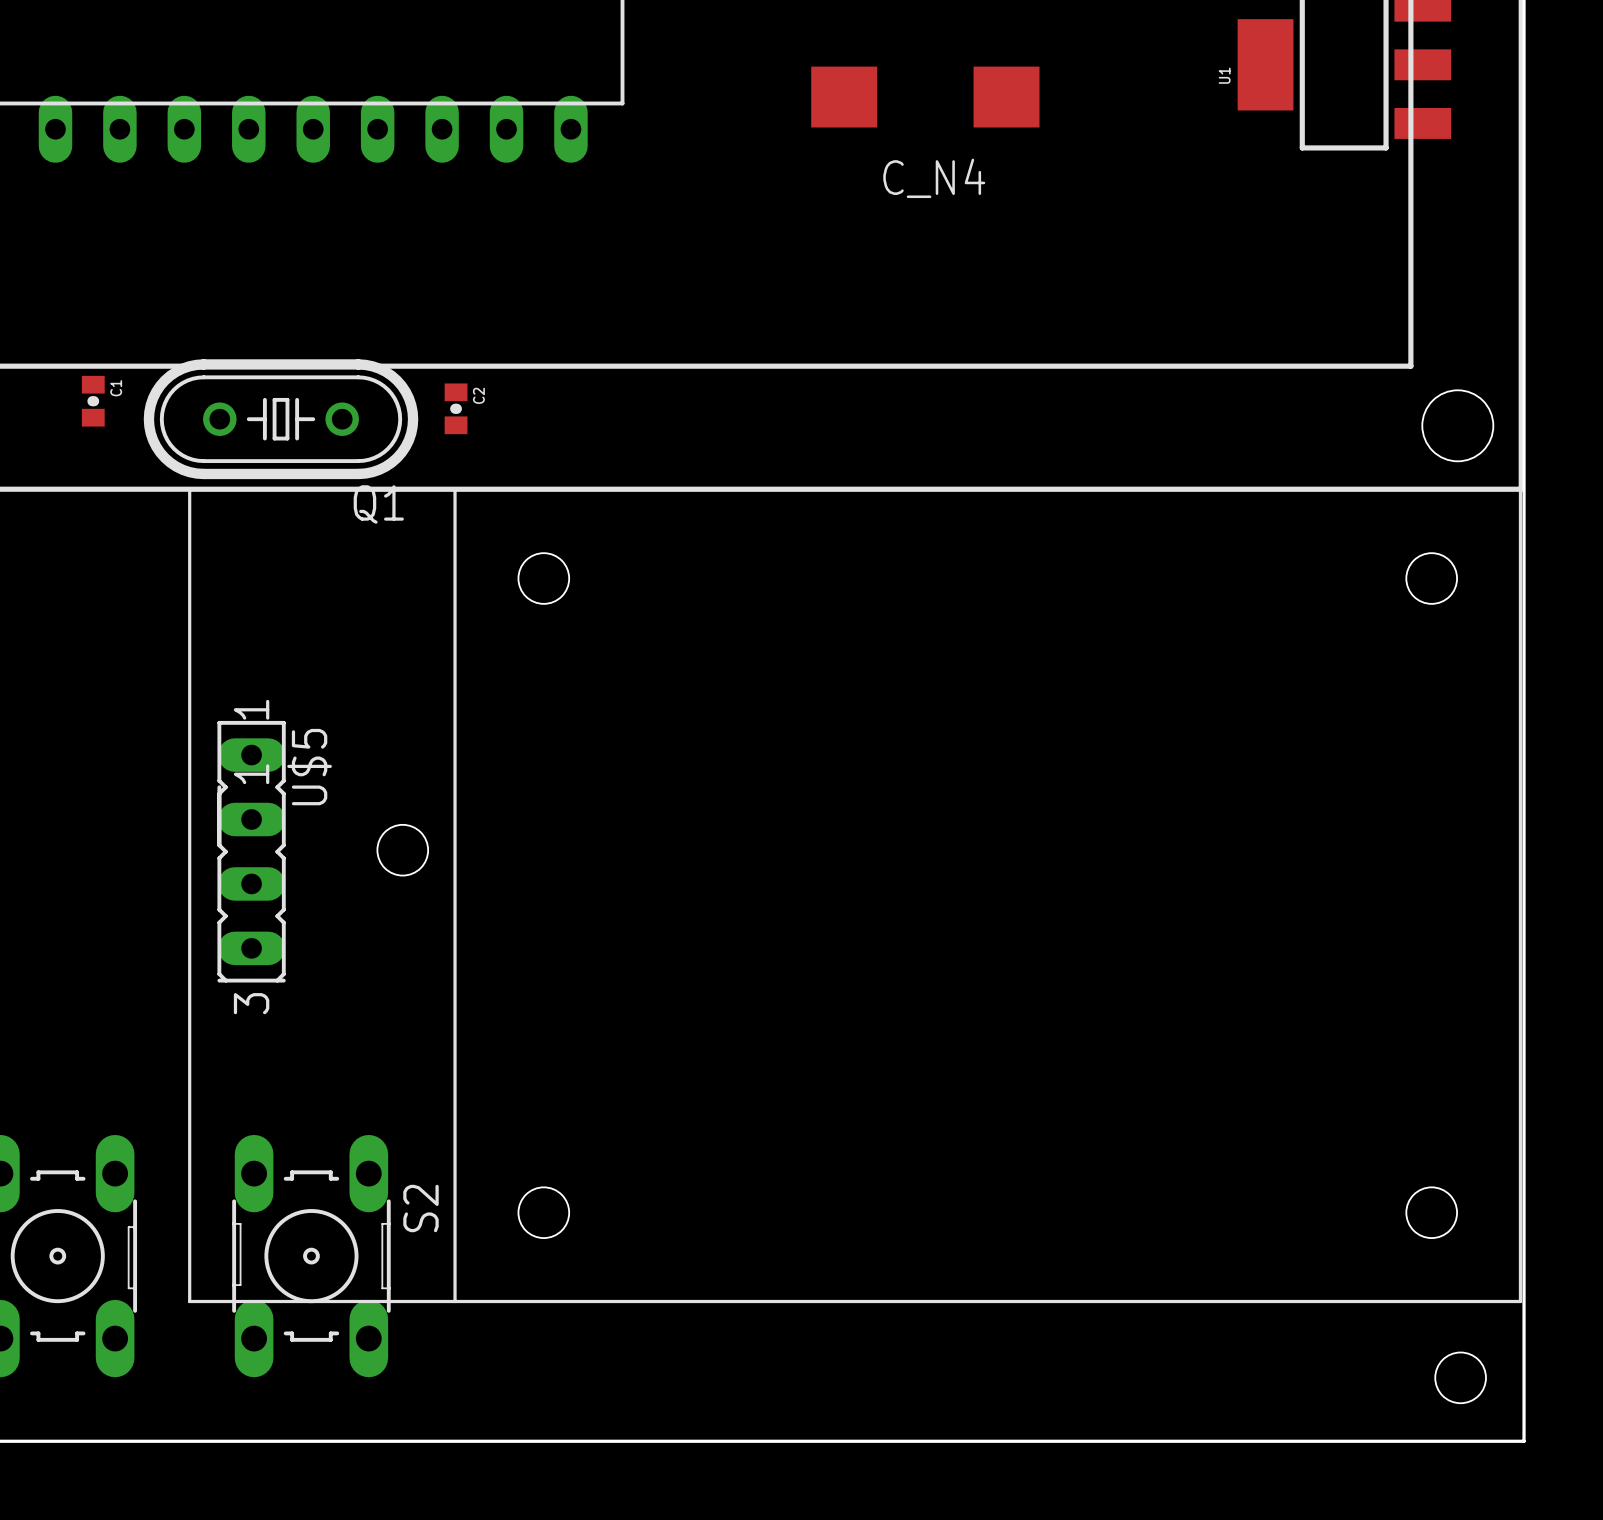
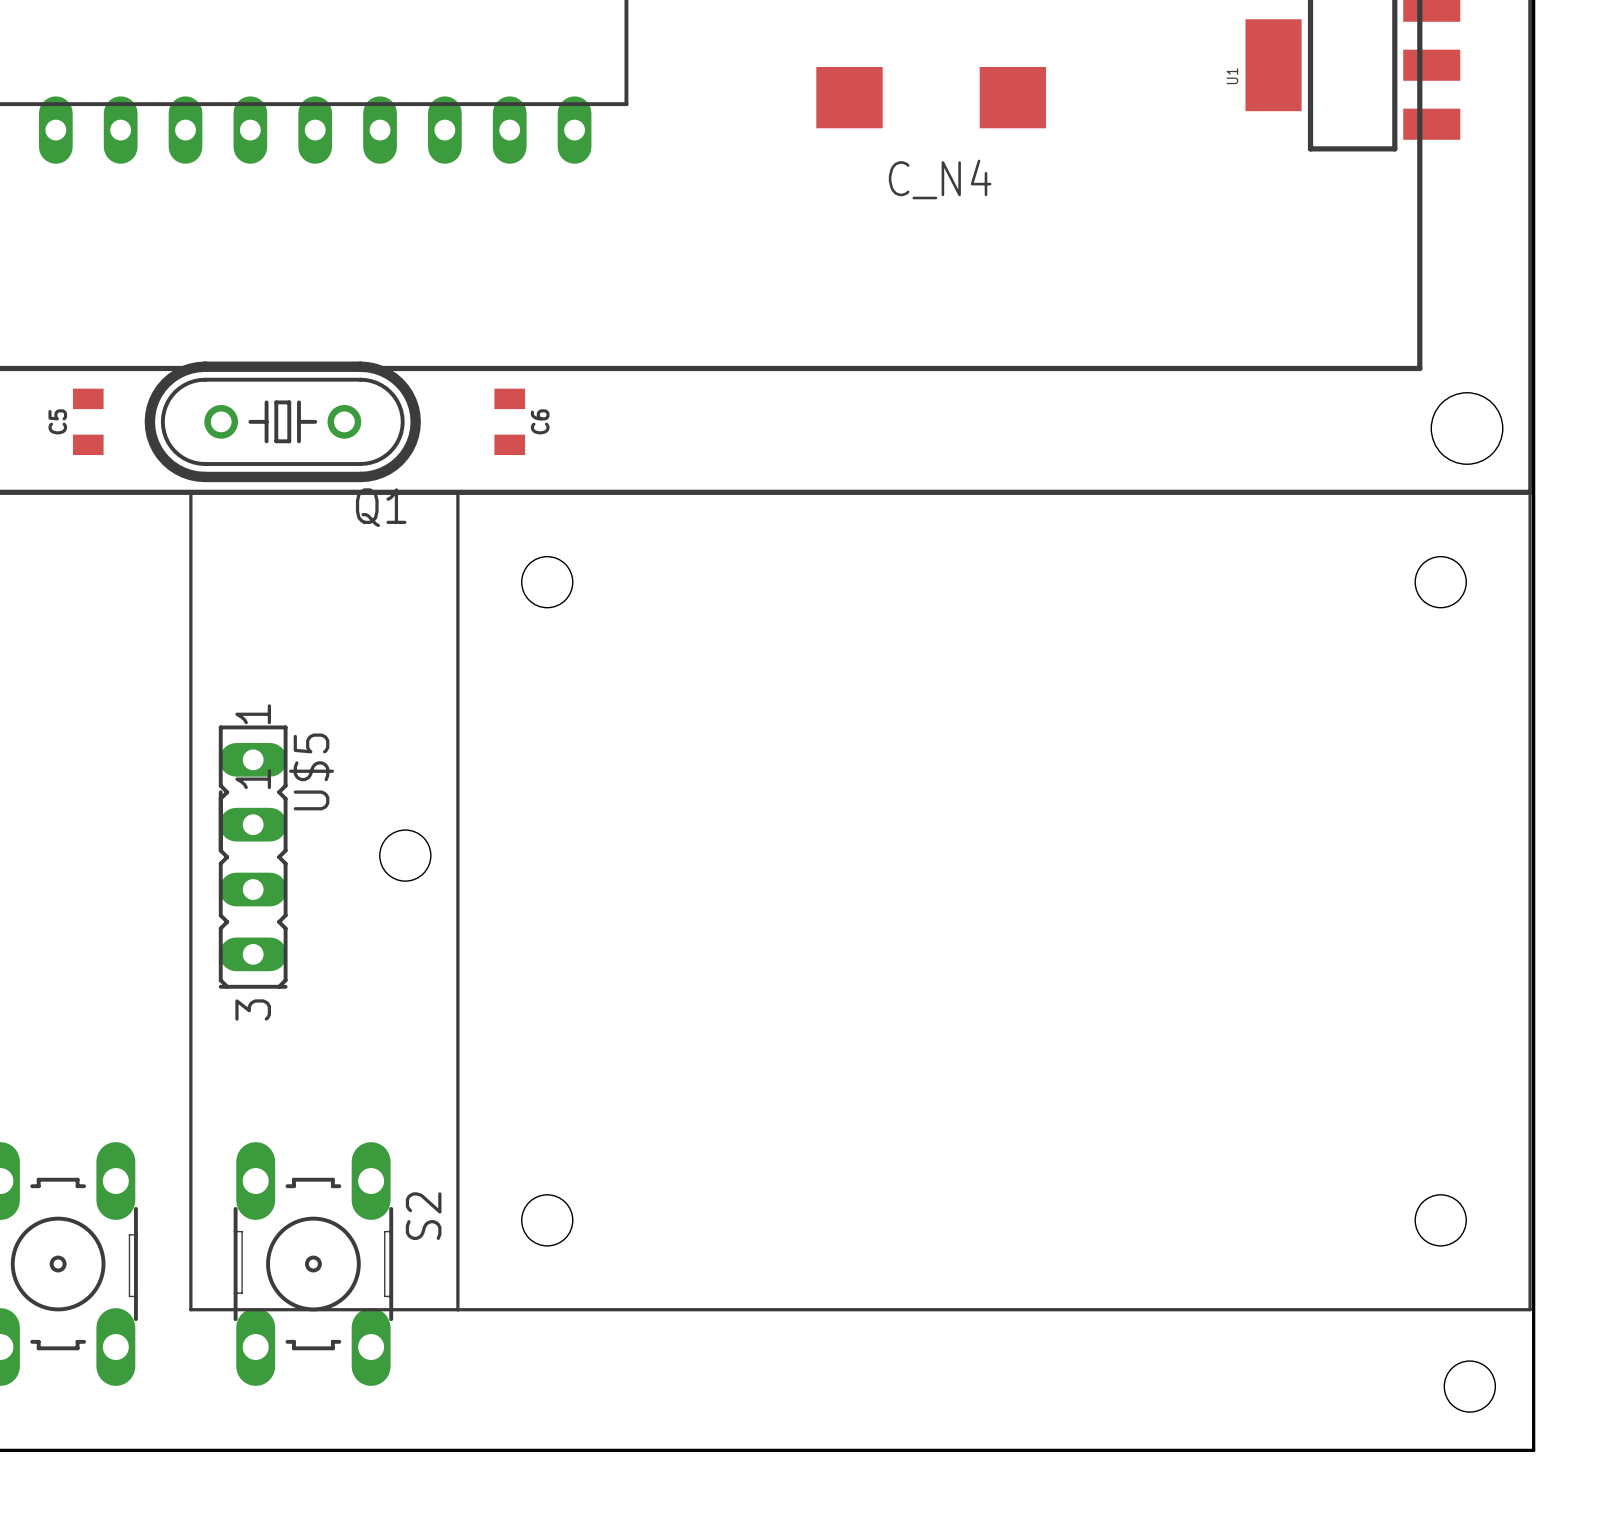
C1: (93, 401) -> none
C2: (456, 408) -> none
C5: none -> (88, 421)
C6: none -> (509, 421)

